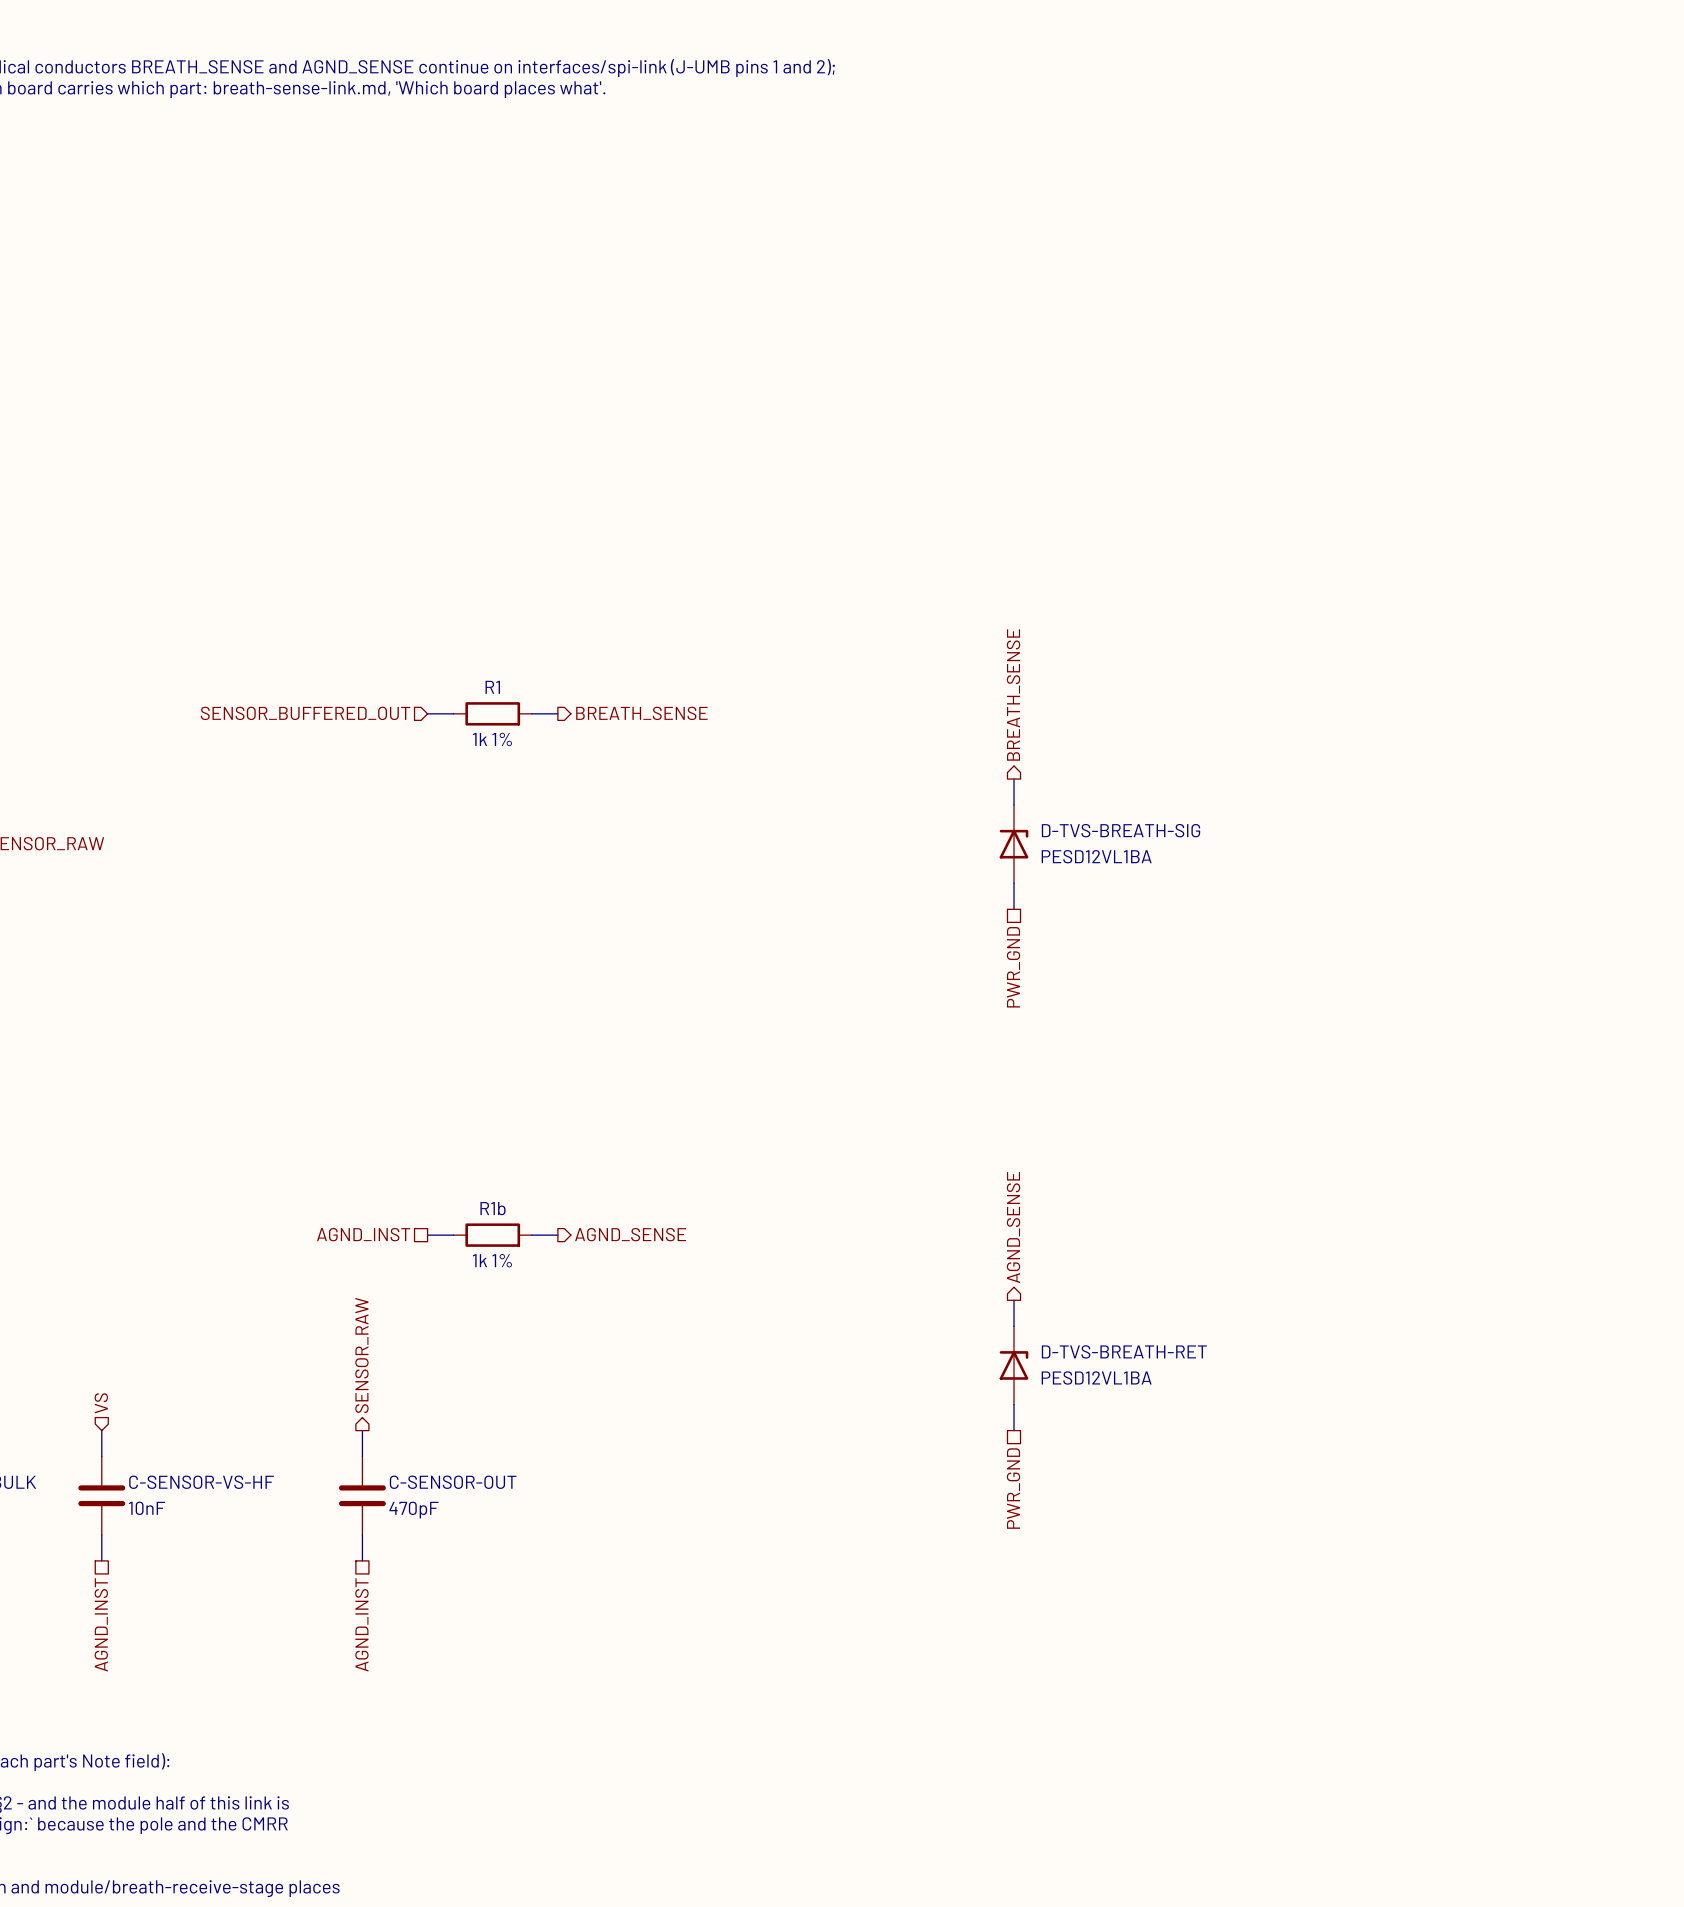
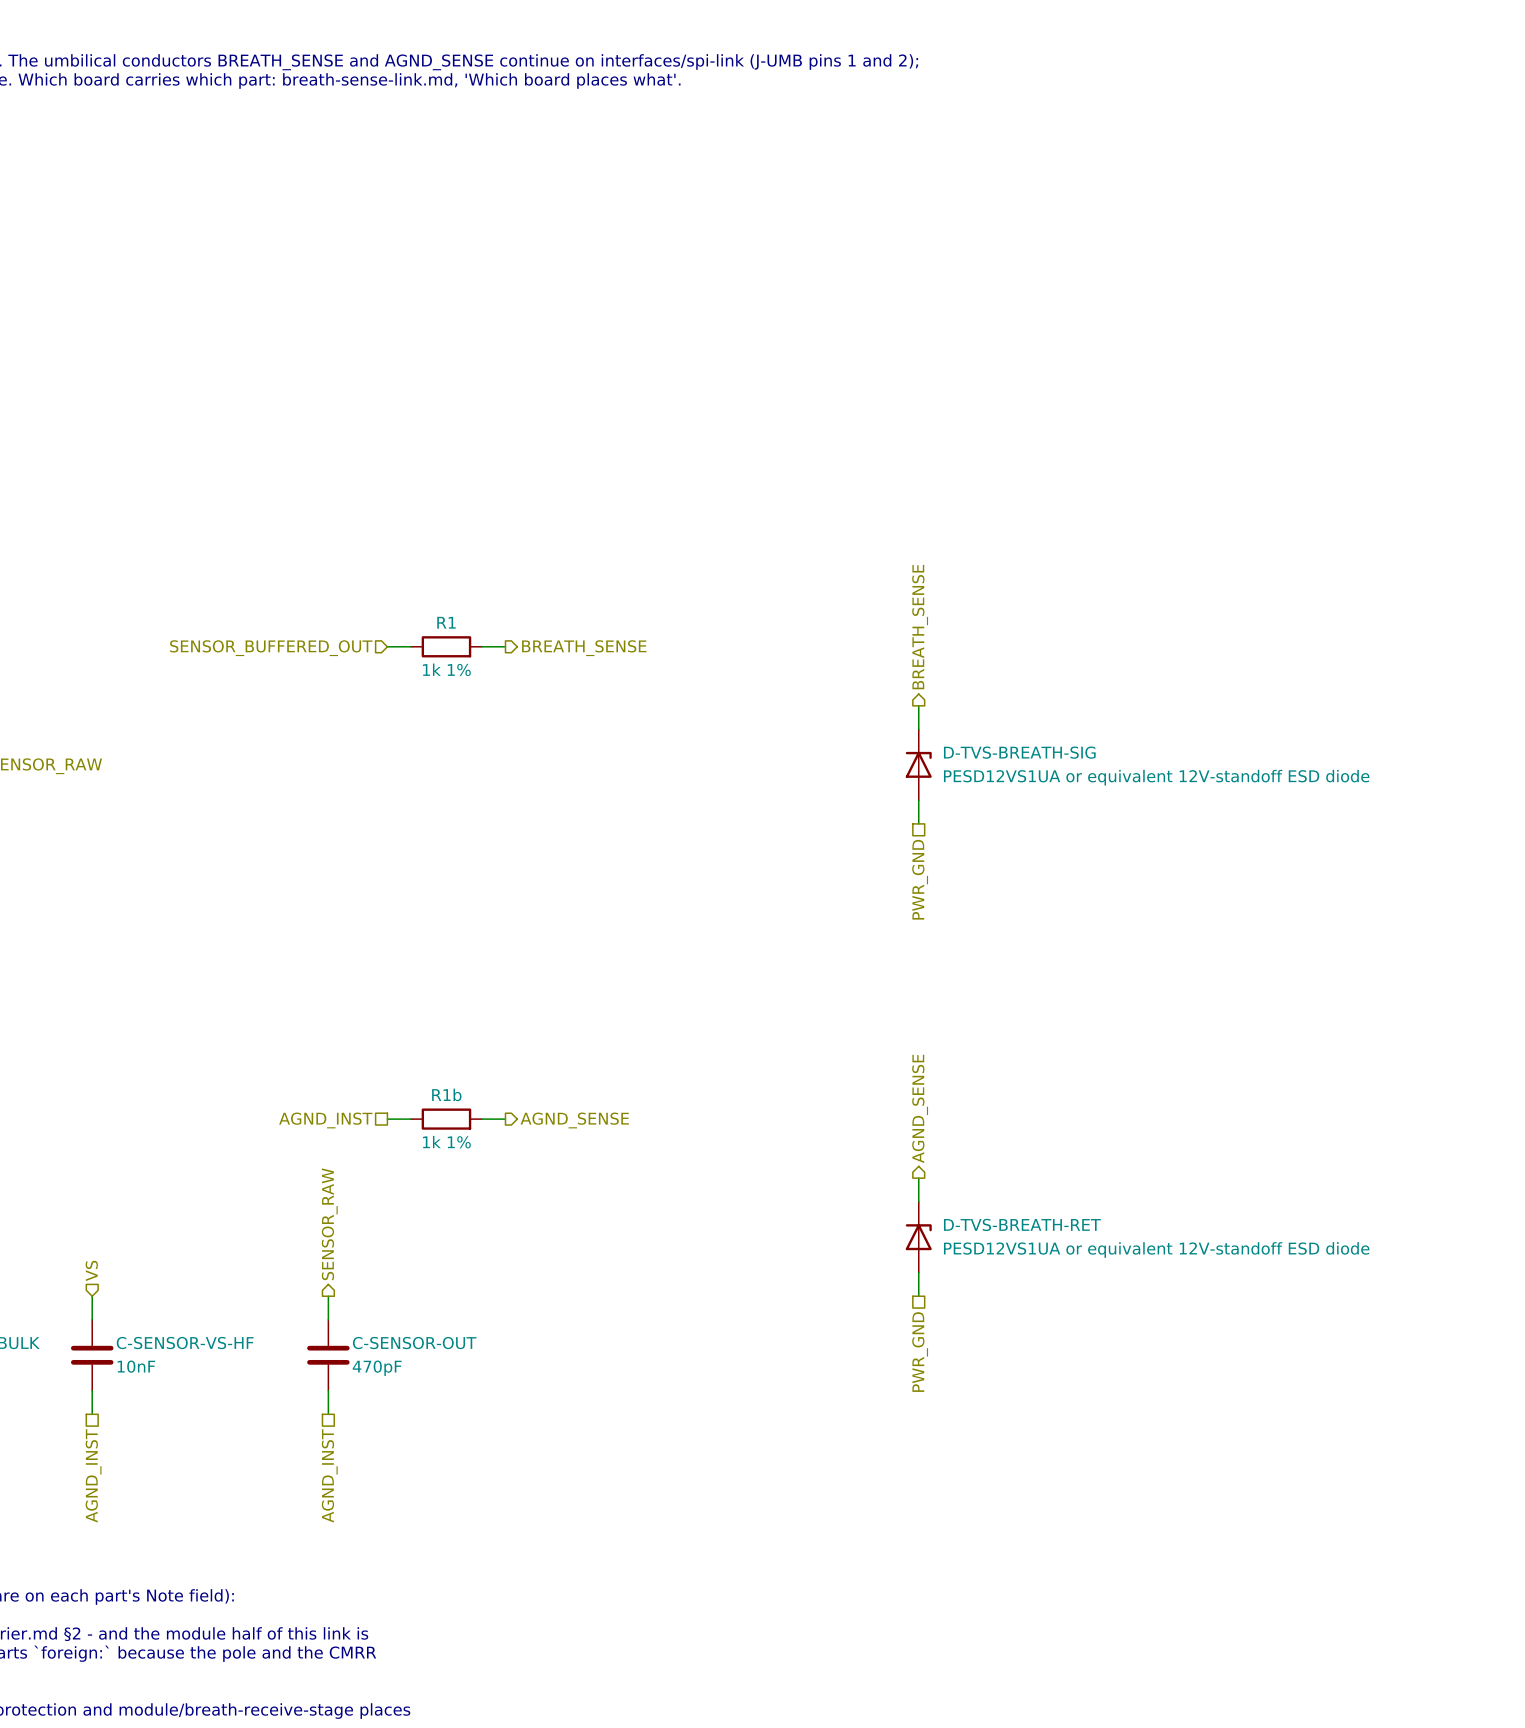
D-TVS-BREATH-SIG value: PESD12VL1BA (1096, 856) -> PESD12VS1UA or equivalent 12V-standoff ESD diode (1156, 777)
D-TVS-BREATH-RET value: PESD12VL1BA (1096, 1377) -> PESD12VS1UA or equivalent 12V-standoff ESD diode (1156, 1249)

